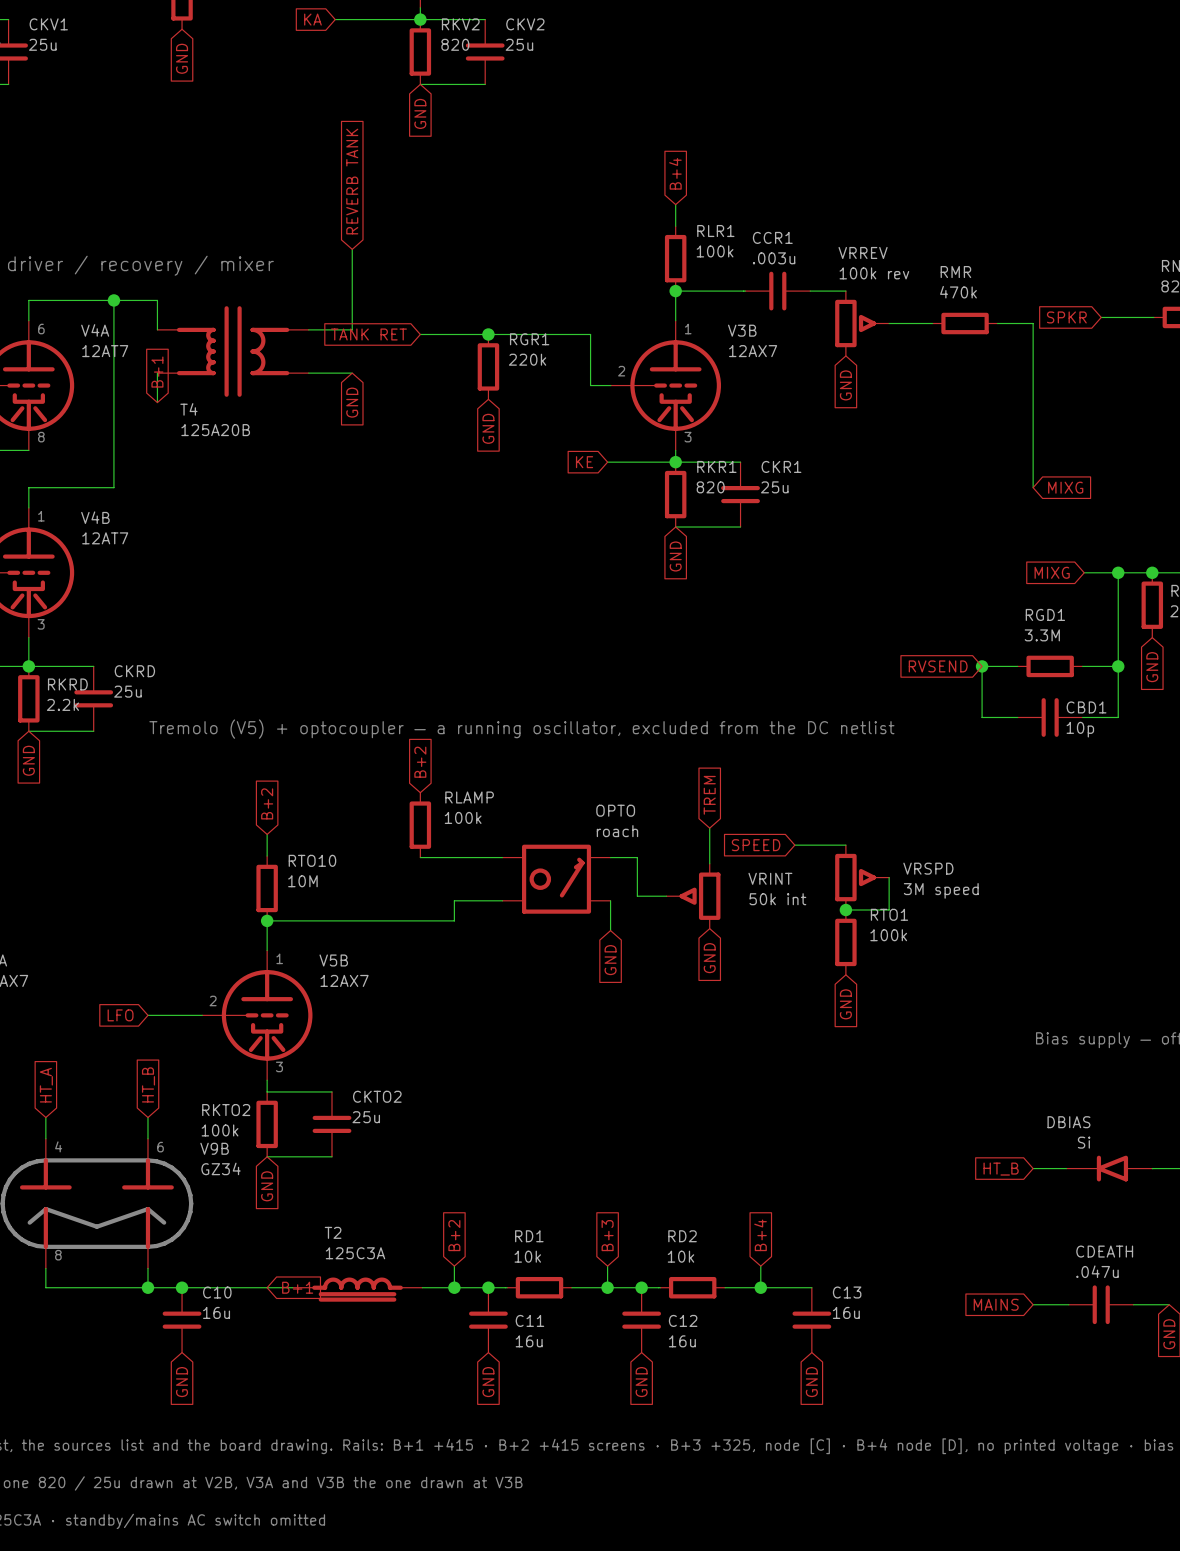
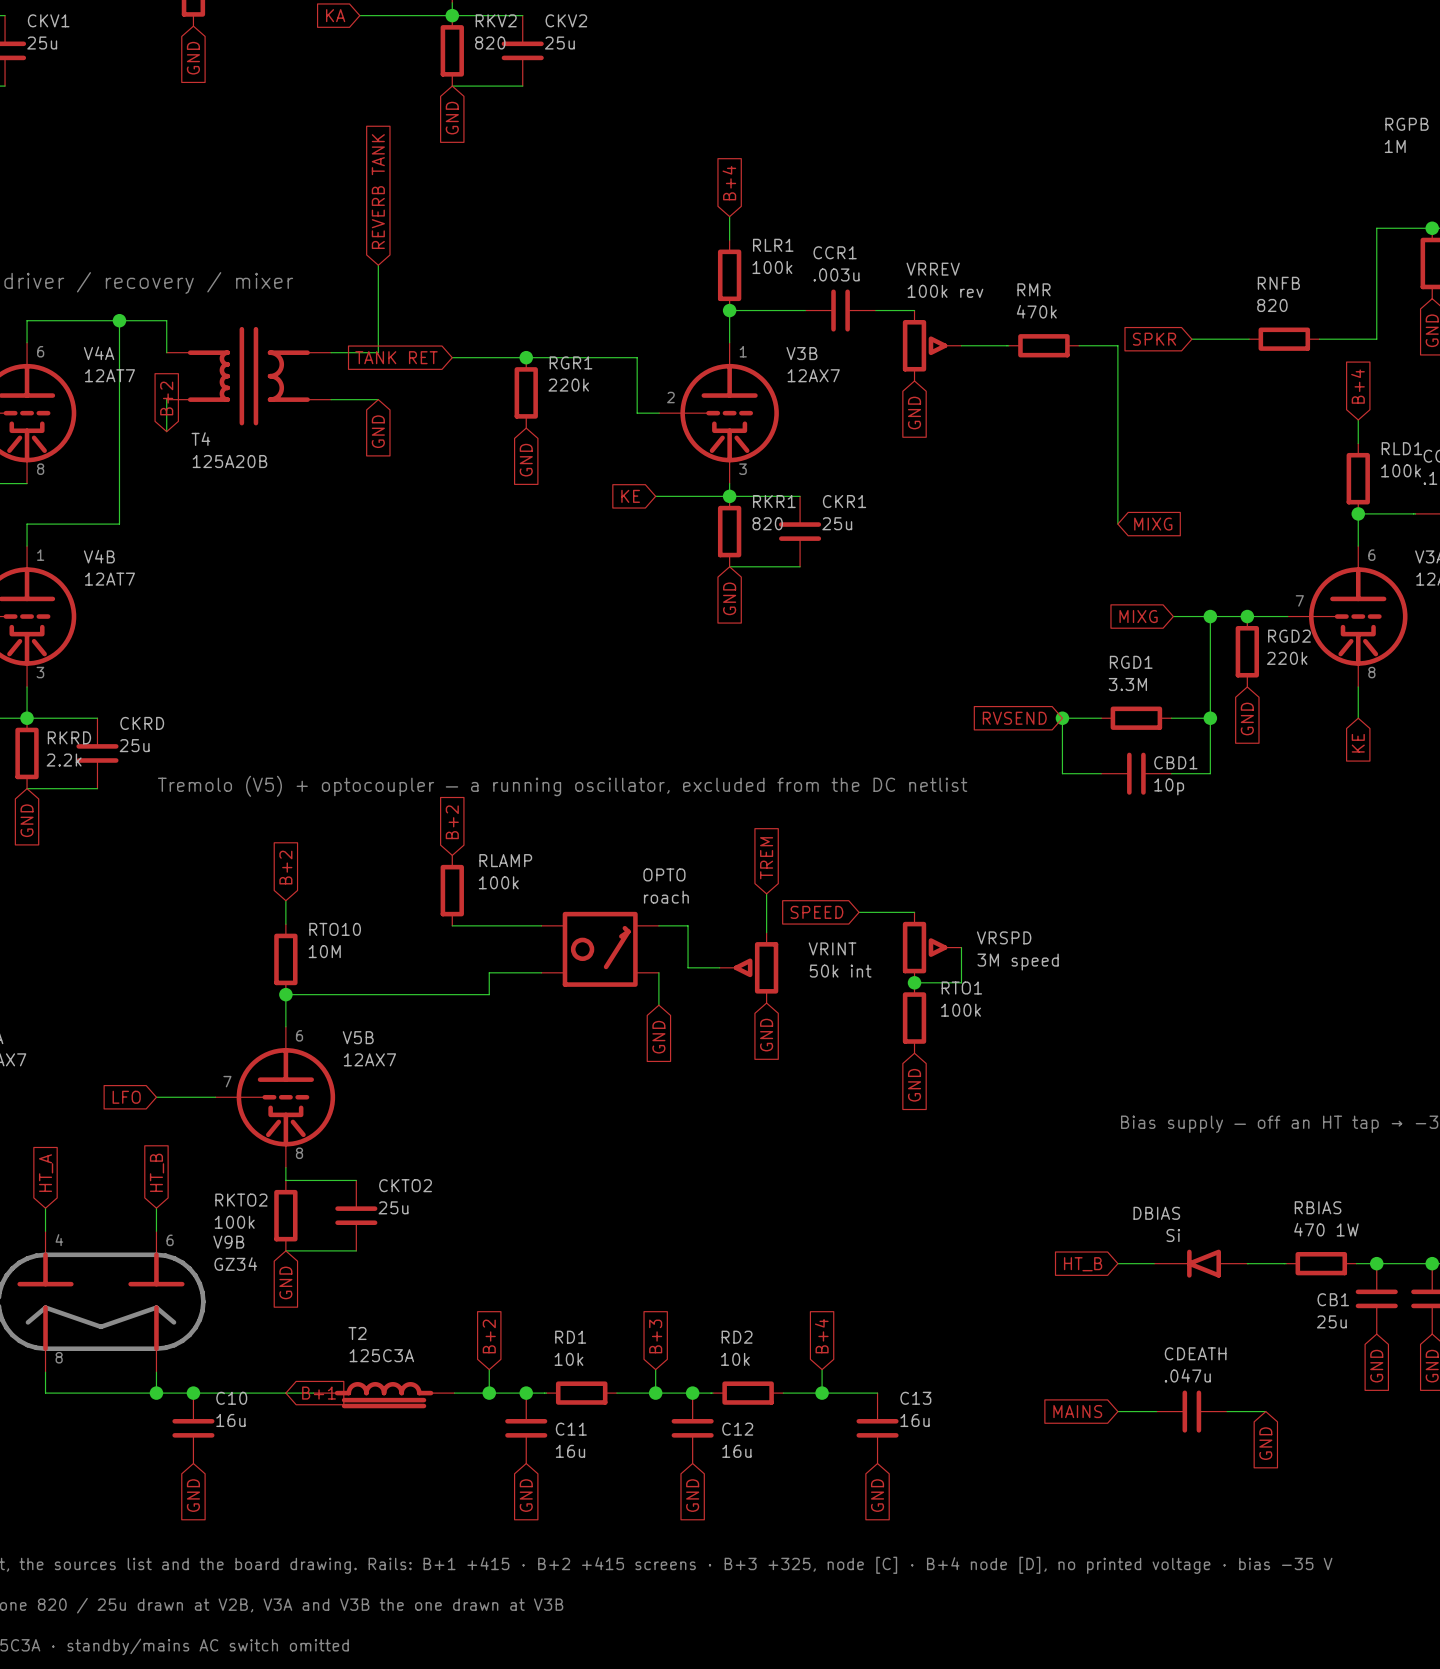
global label: B+1 (157, 372) -> B+2 (166, 398)
text: 1 (279, 958) -> 6 (299, 1035)
text: 2 (213, 1000) -> 7 (227, 1081)
text: 3 (279, 1066) -> 8 (299, 1153)

